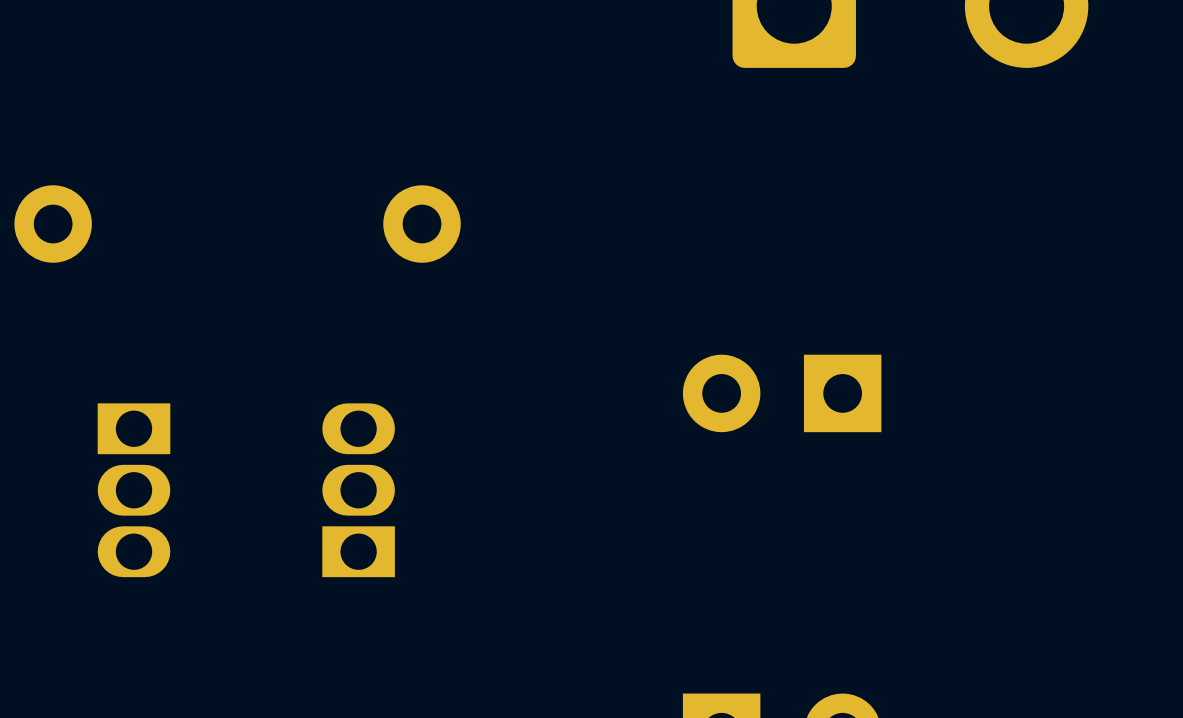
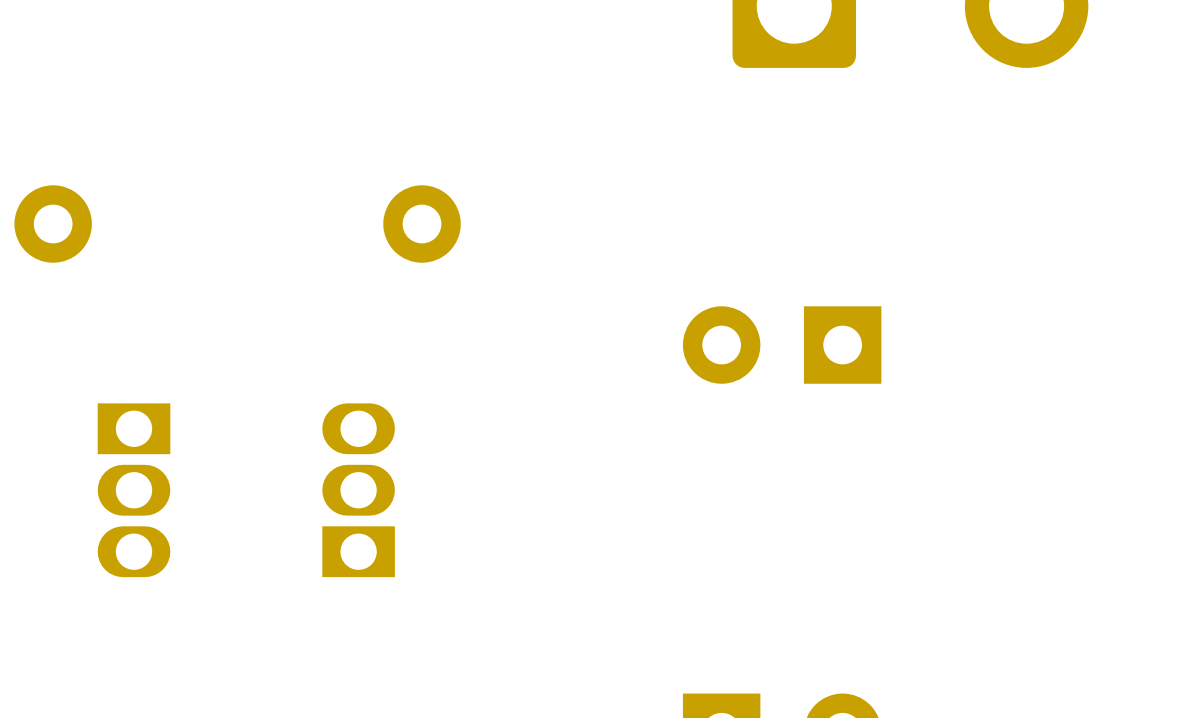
part position: (782, 393) -> (782, 345)

